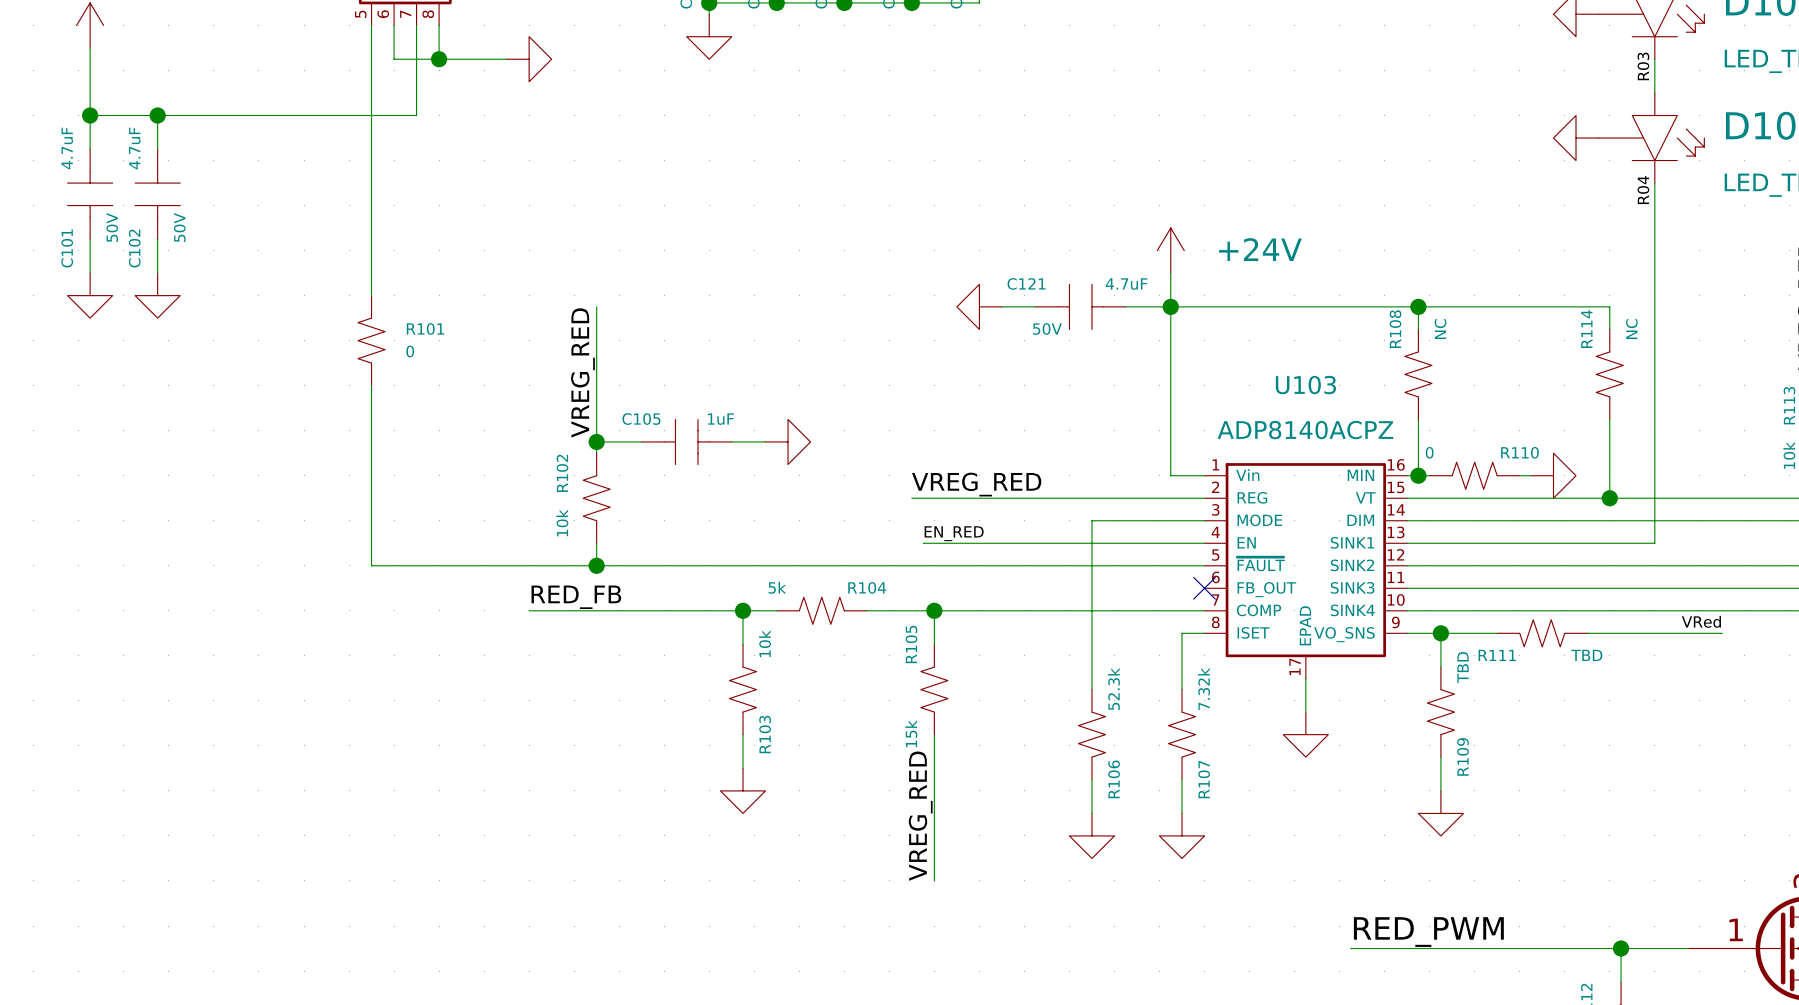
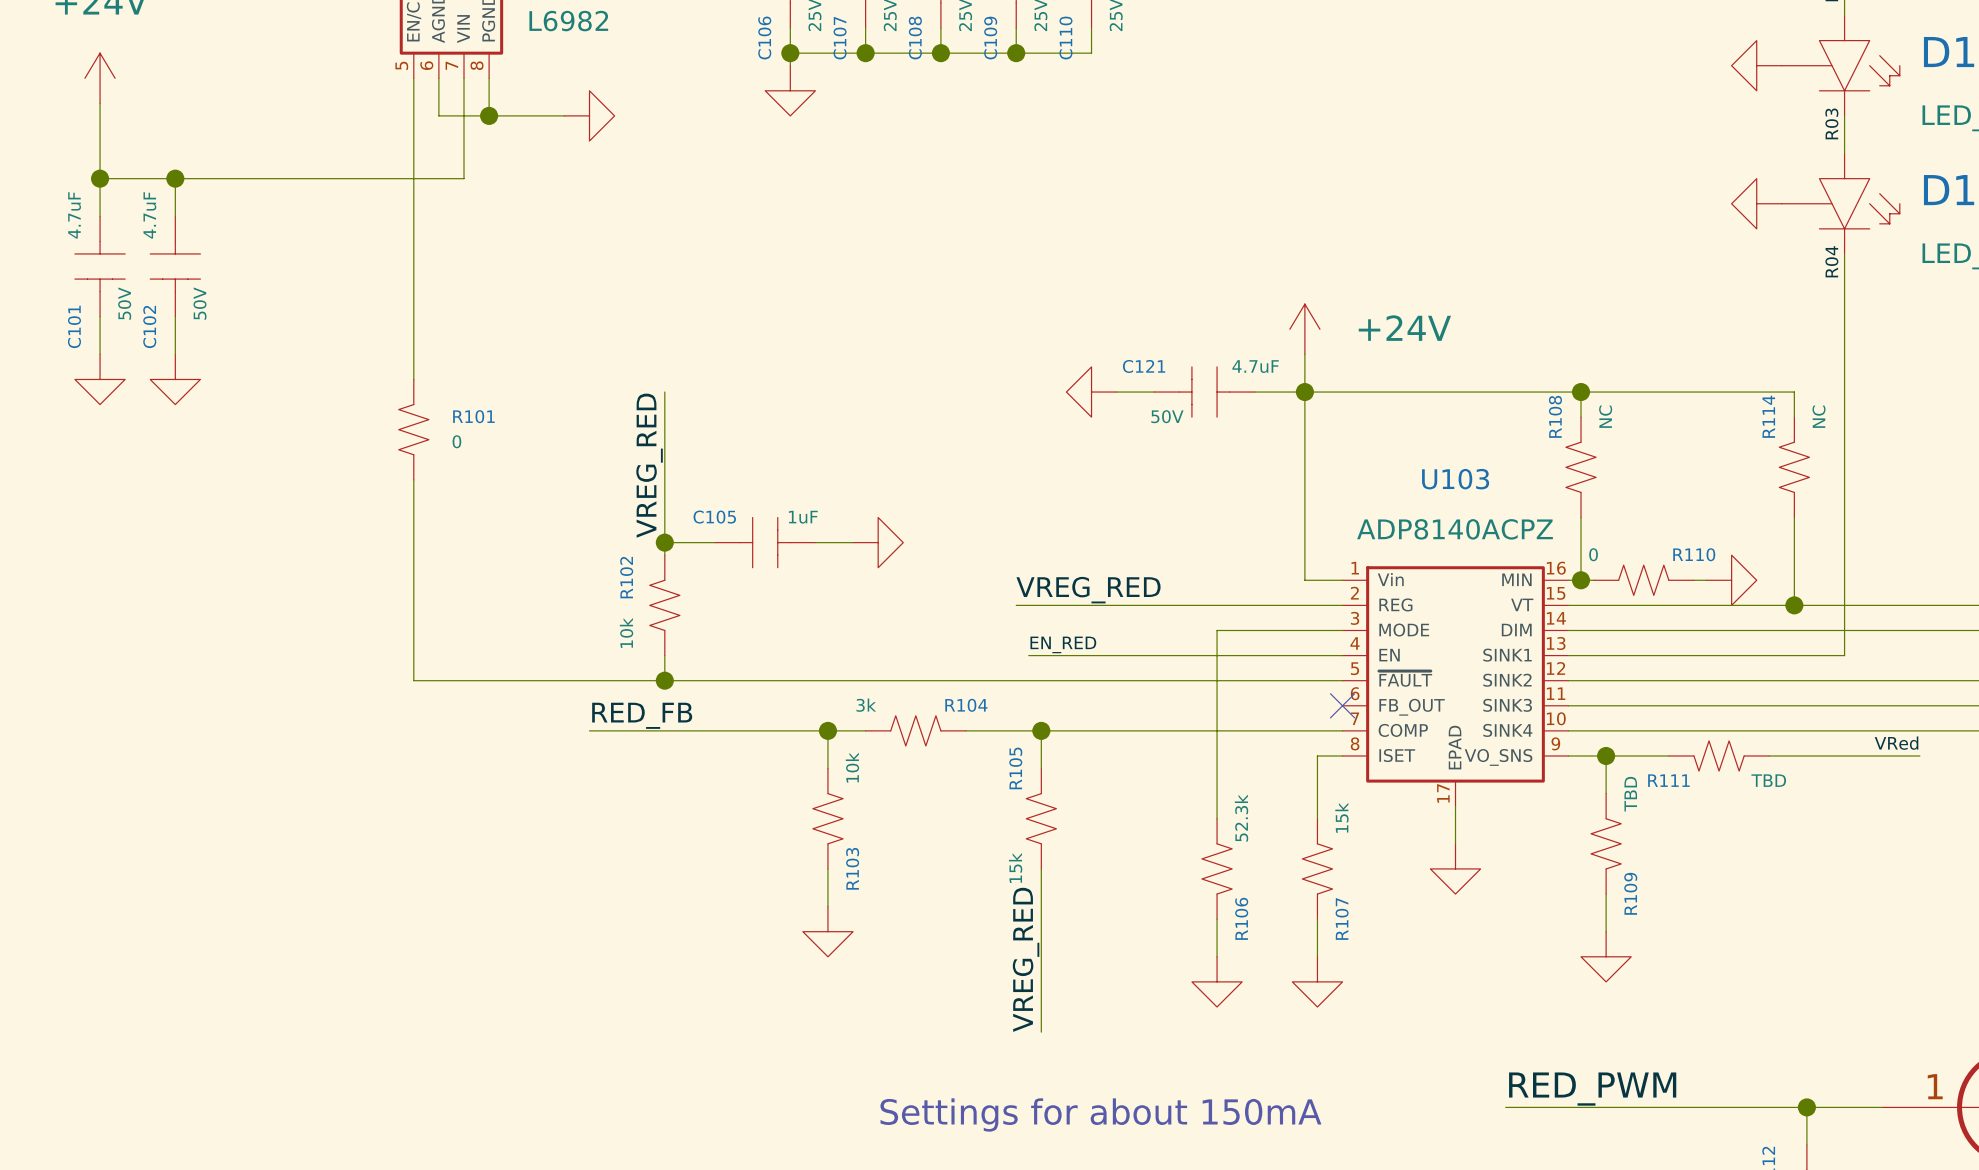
R104 value: 5k (777, 587) -> 3k (866, 705)
R107 value: 7.32k (1203, 689) -> 15k (1341, 817)
text: none -> Settings for about 150mA (1100, 1115)

